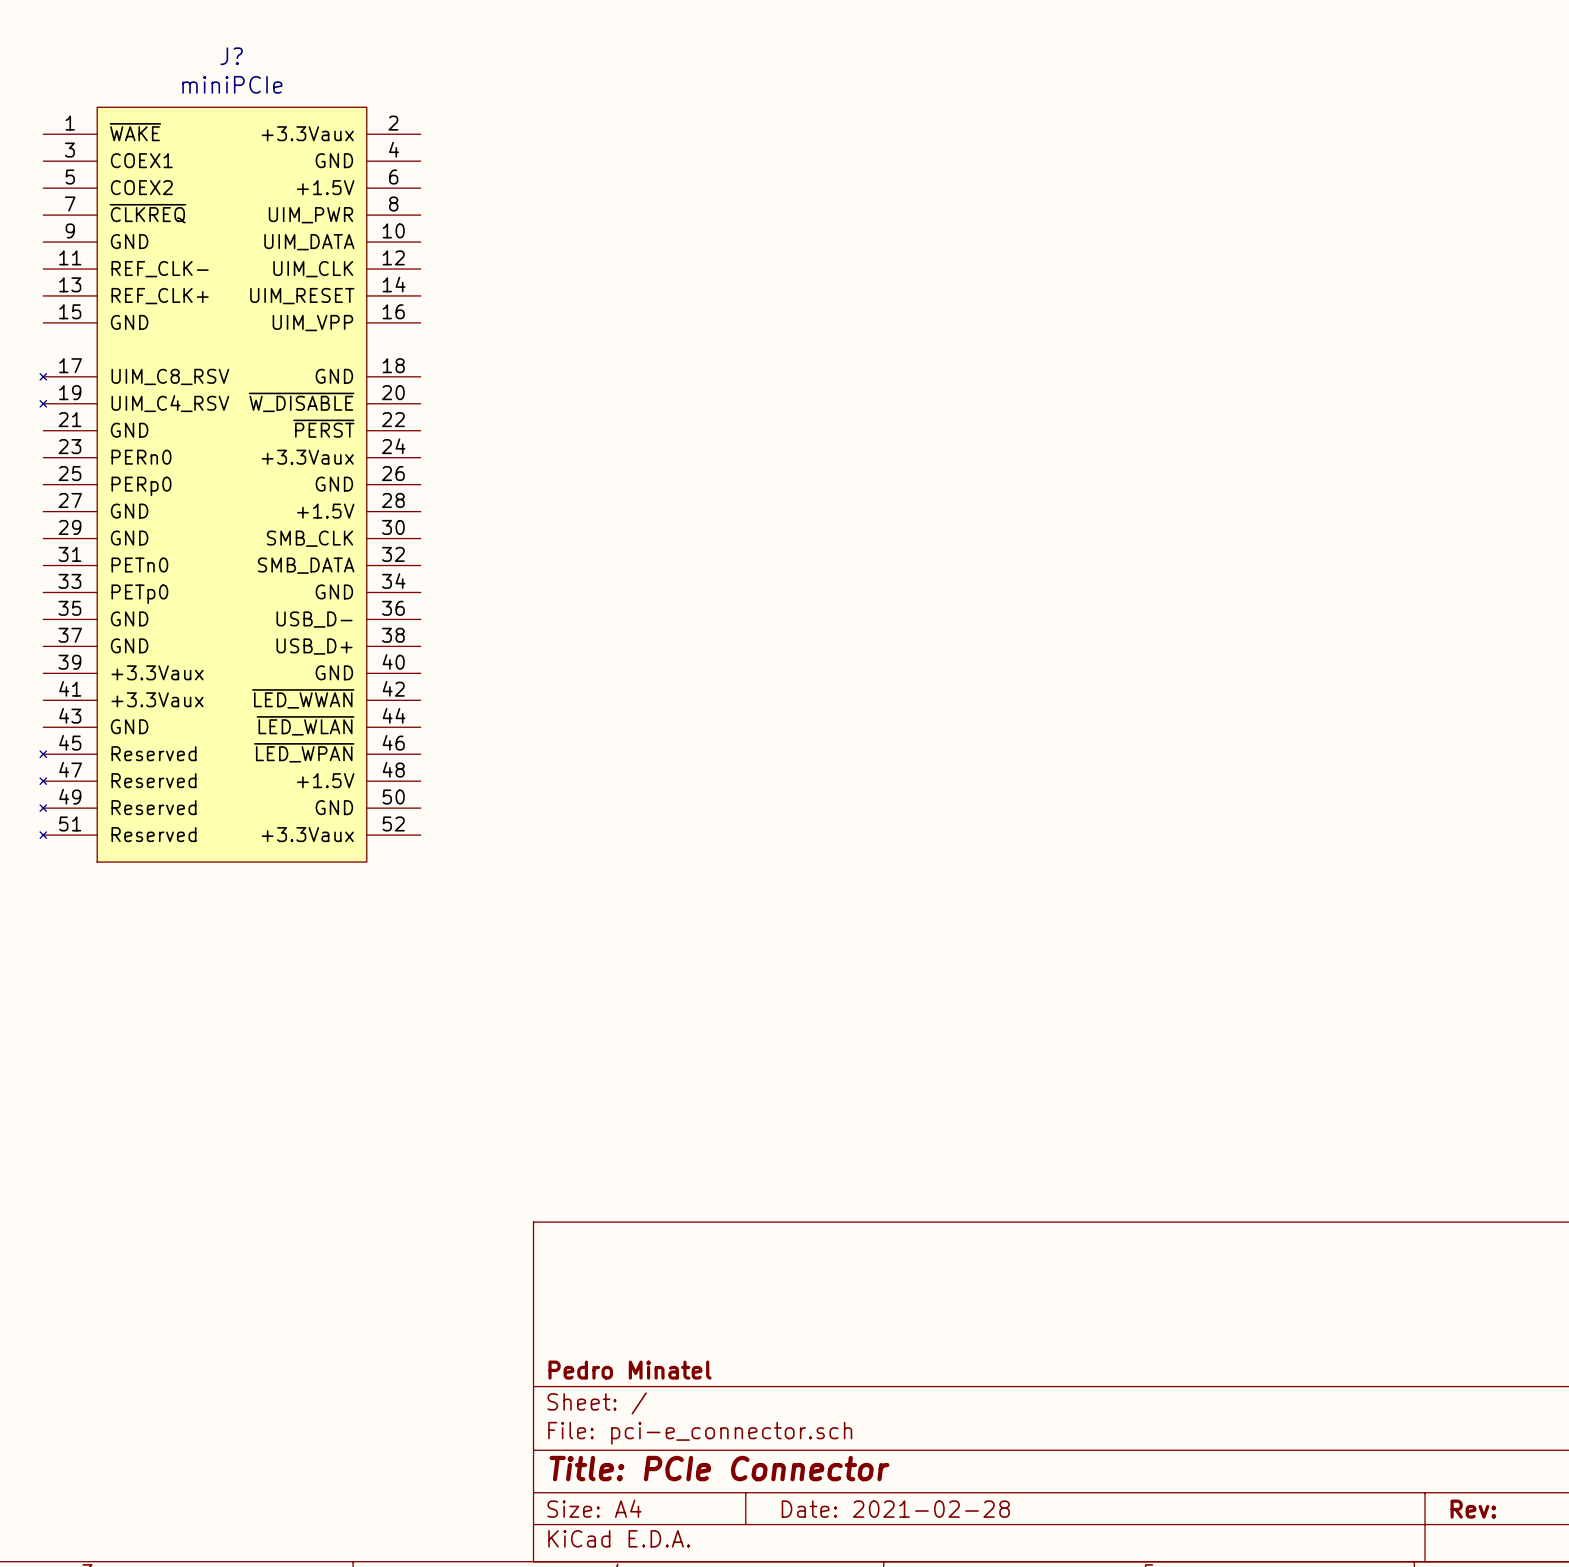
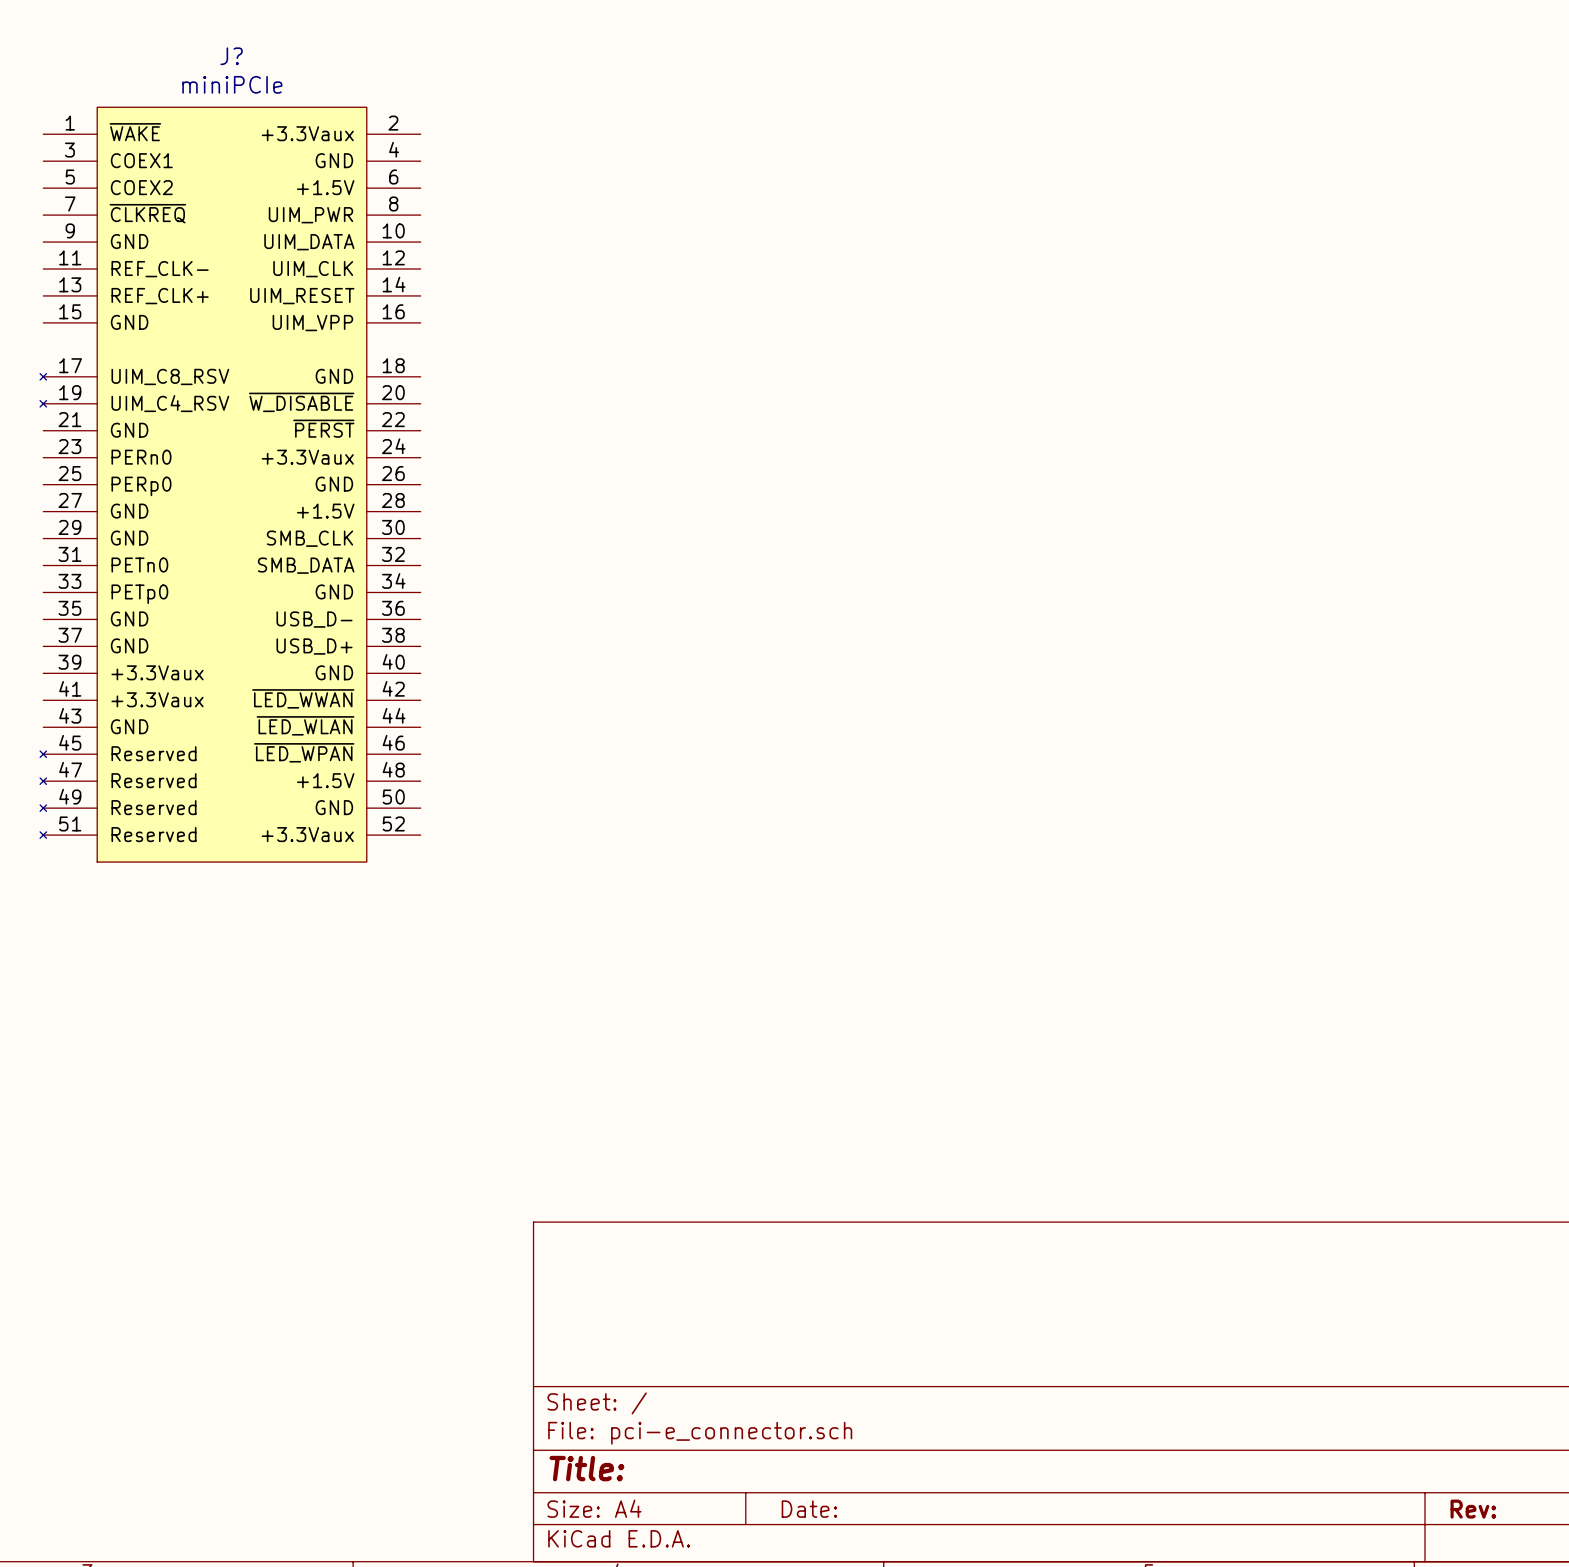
title block: Pedro Minatel (629, 1370) -> none
title block: Title: PCIe Connector (719, 1468) -> Title: (586, 1468)
title block: Date: 2021-02-28 (895, 1509) -> Date: (809, 1509)

